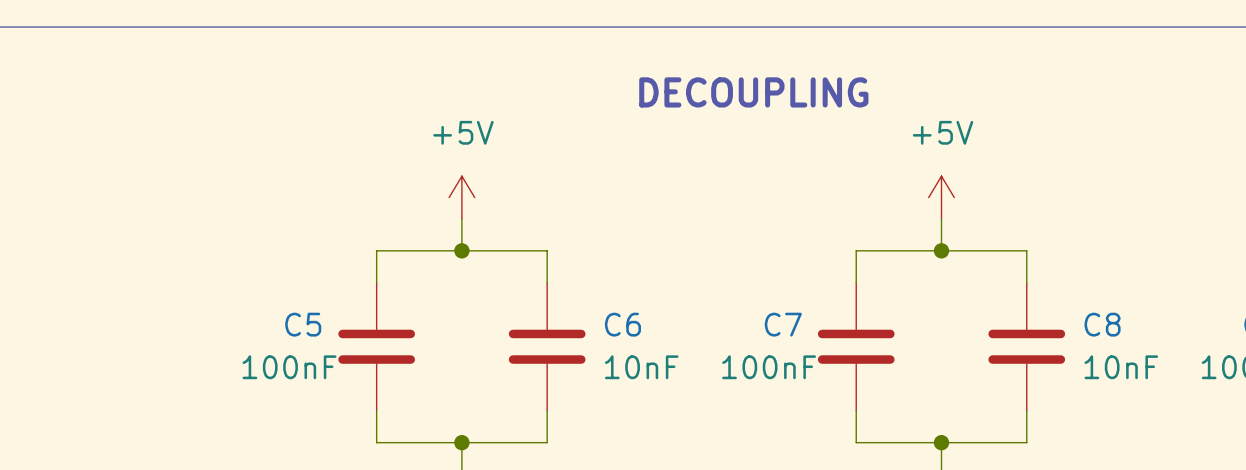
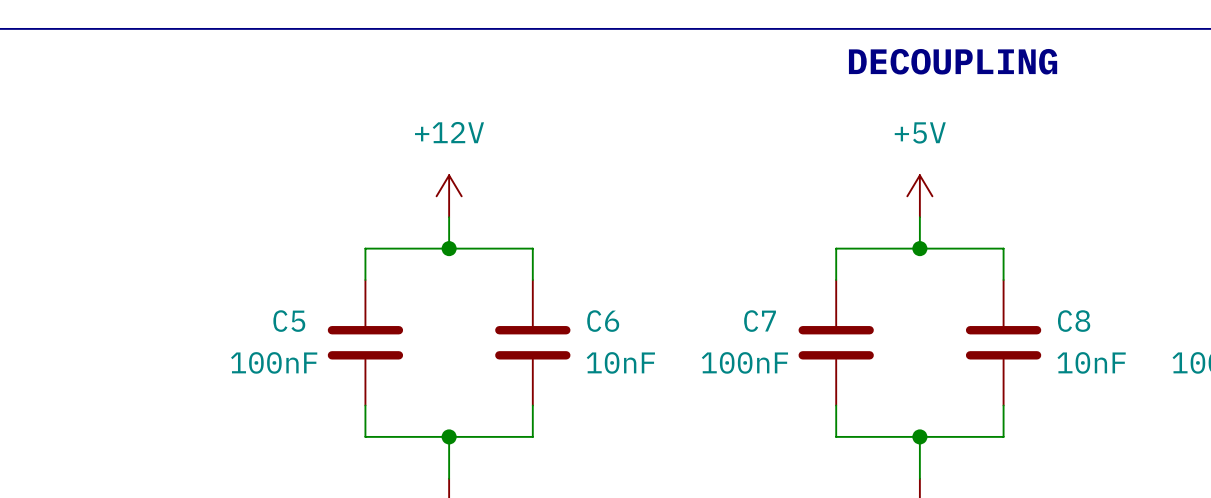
text position: DECOUPLING (753, 92) -> DECOUPLING (953, 61)
power symbol: +5V (461, 197) -> +12V (449, 196)

